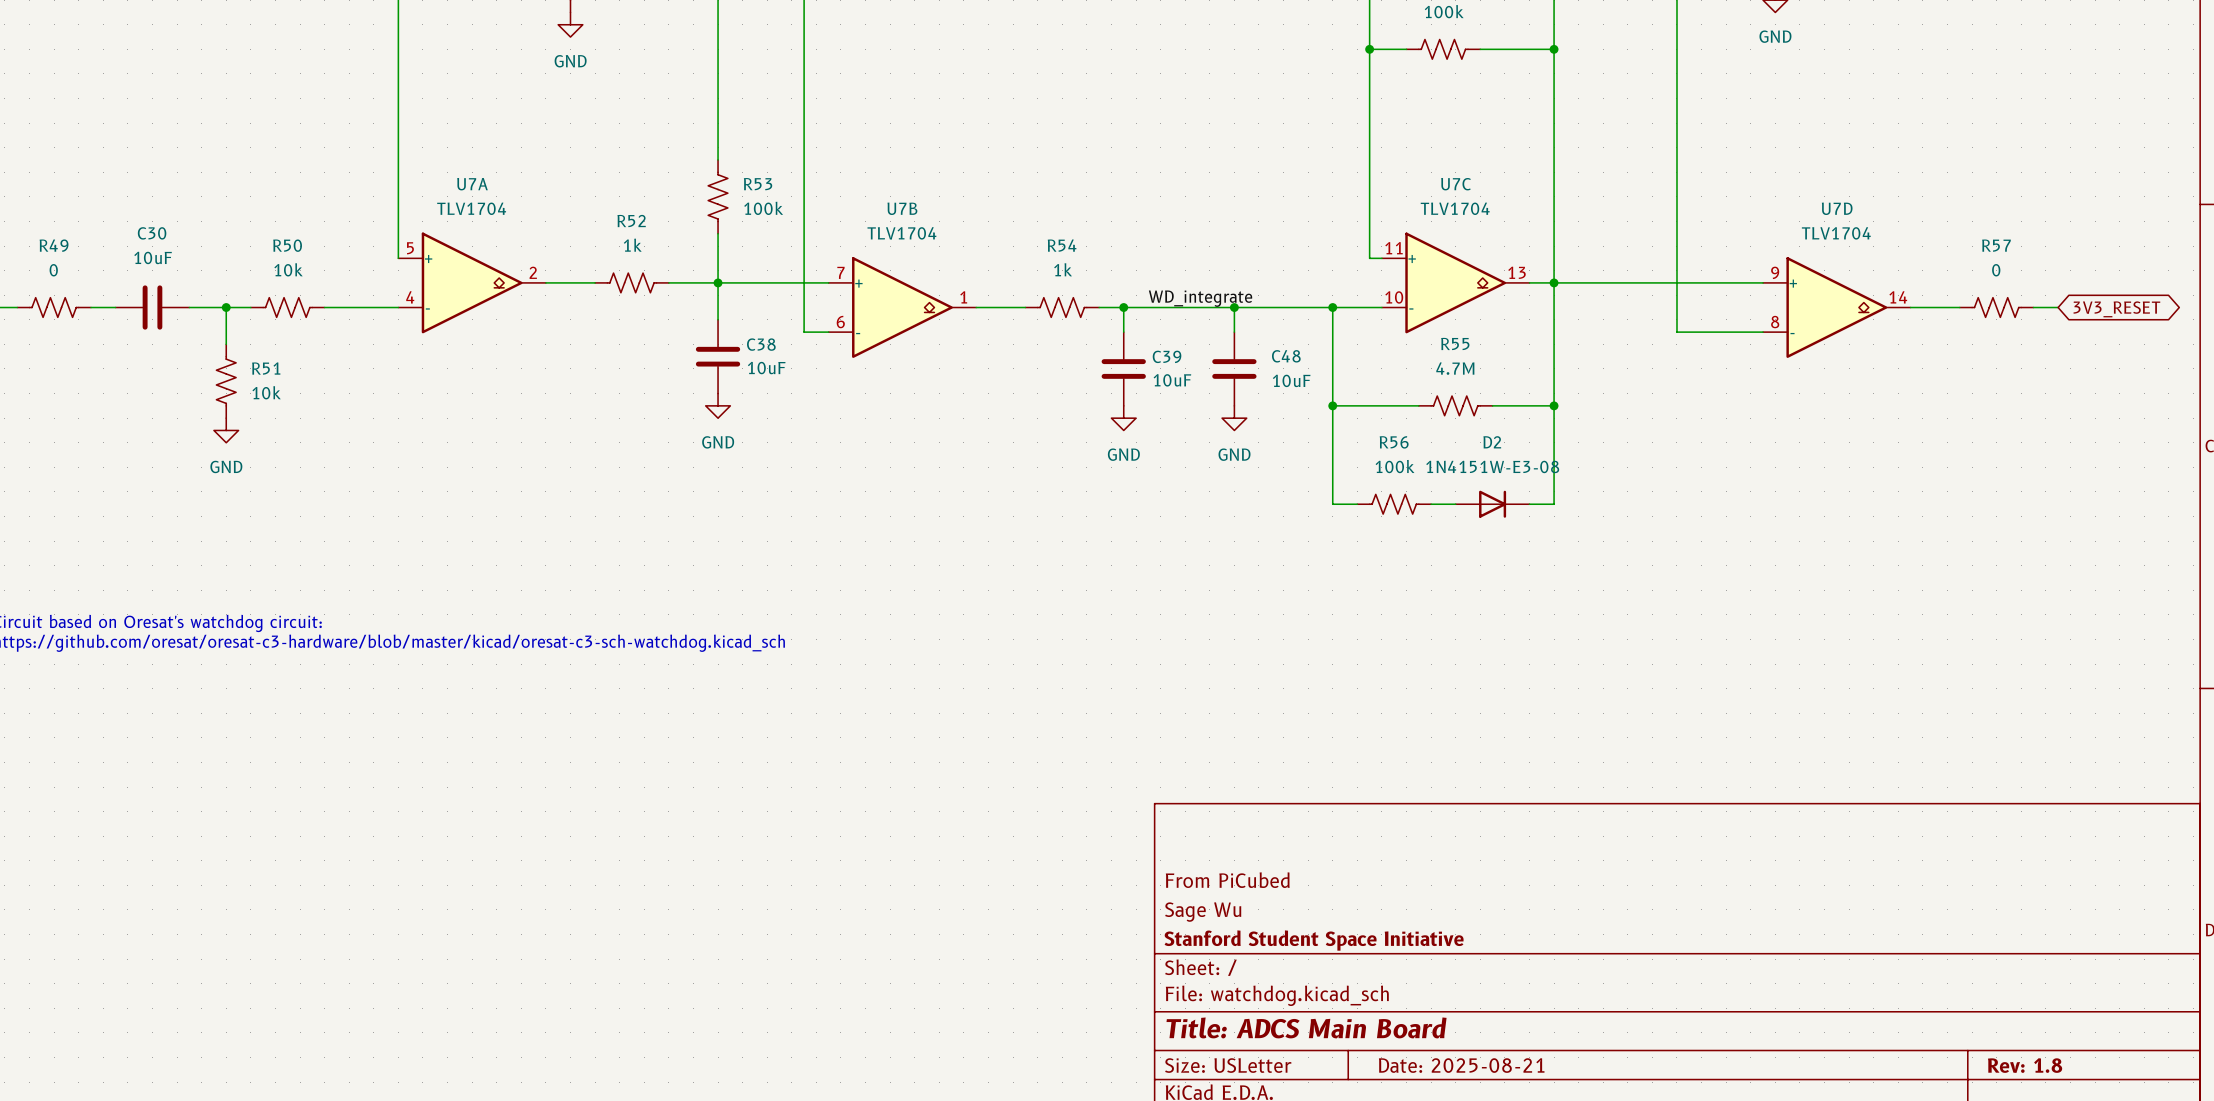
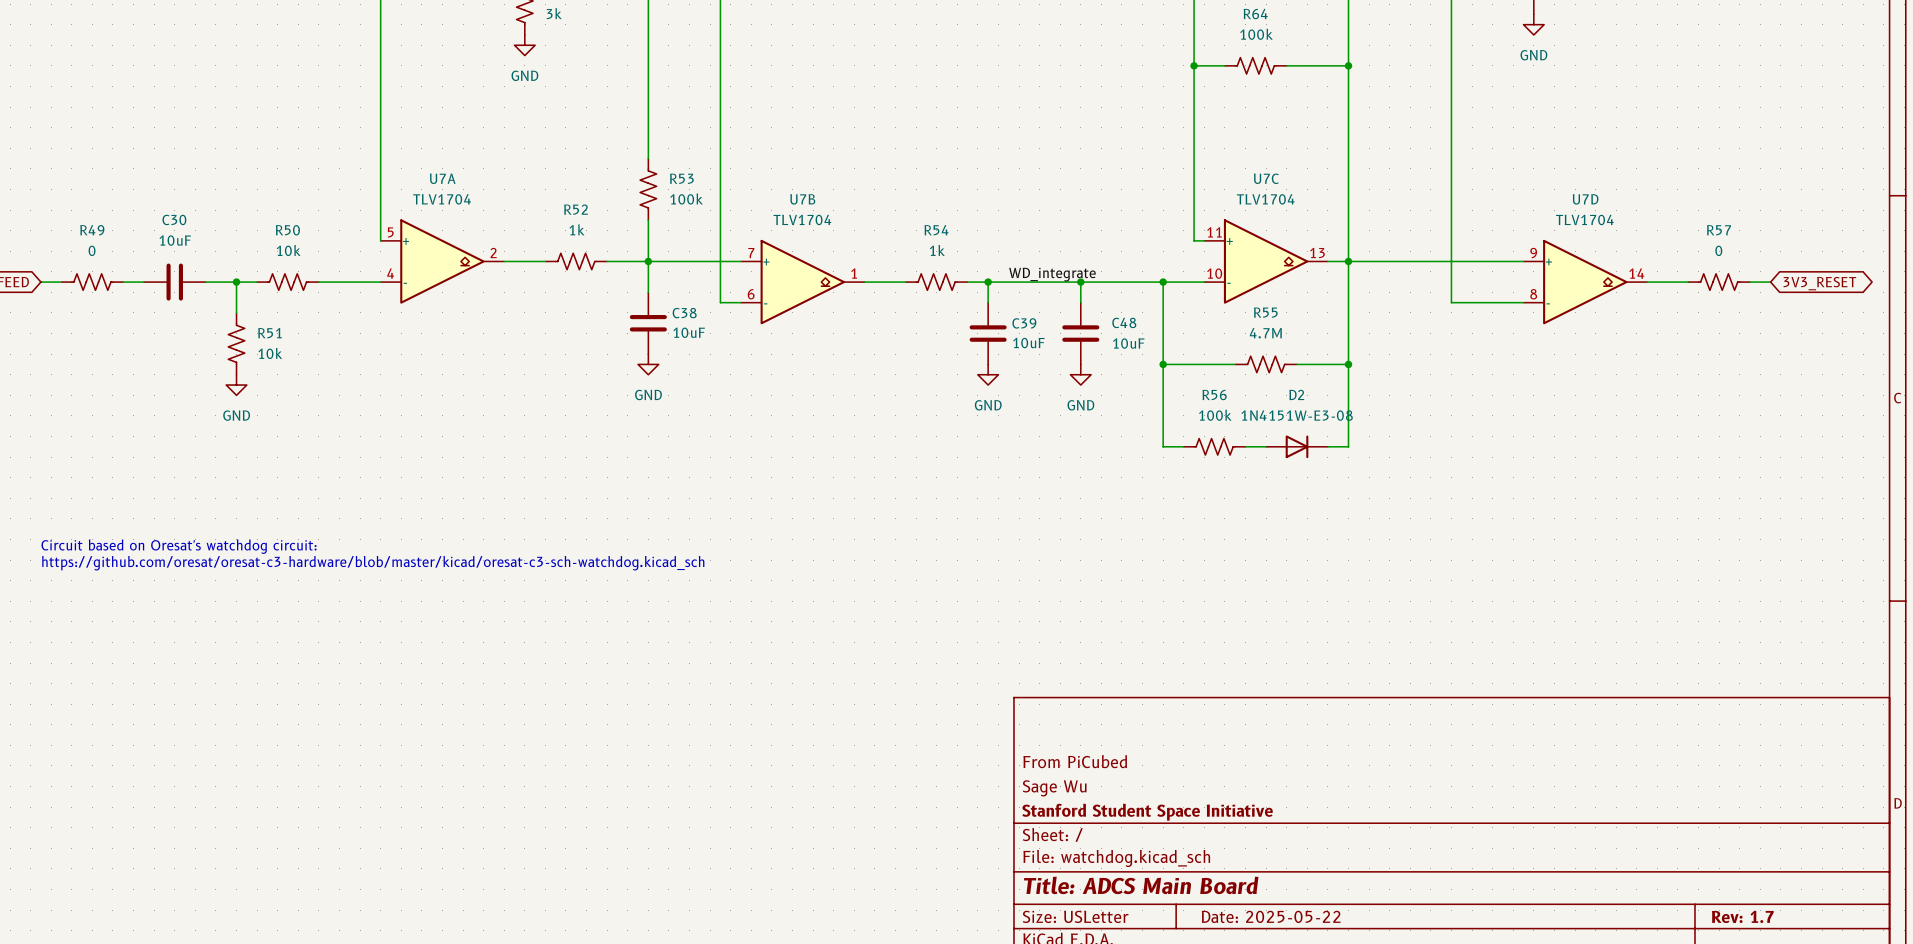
title block: Date: 2025-08-21 (1461, 1065) -> Date: 2025-05-22 (1271, 916)
title block: Rev: 1.8 (2025, 1065) -> Rev: 1.7 (1742, 916)

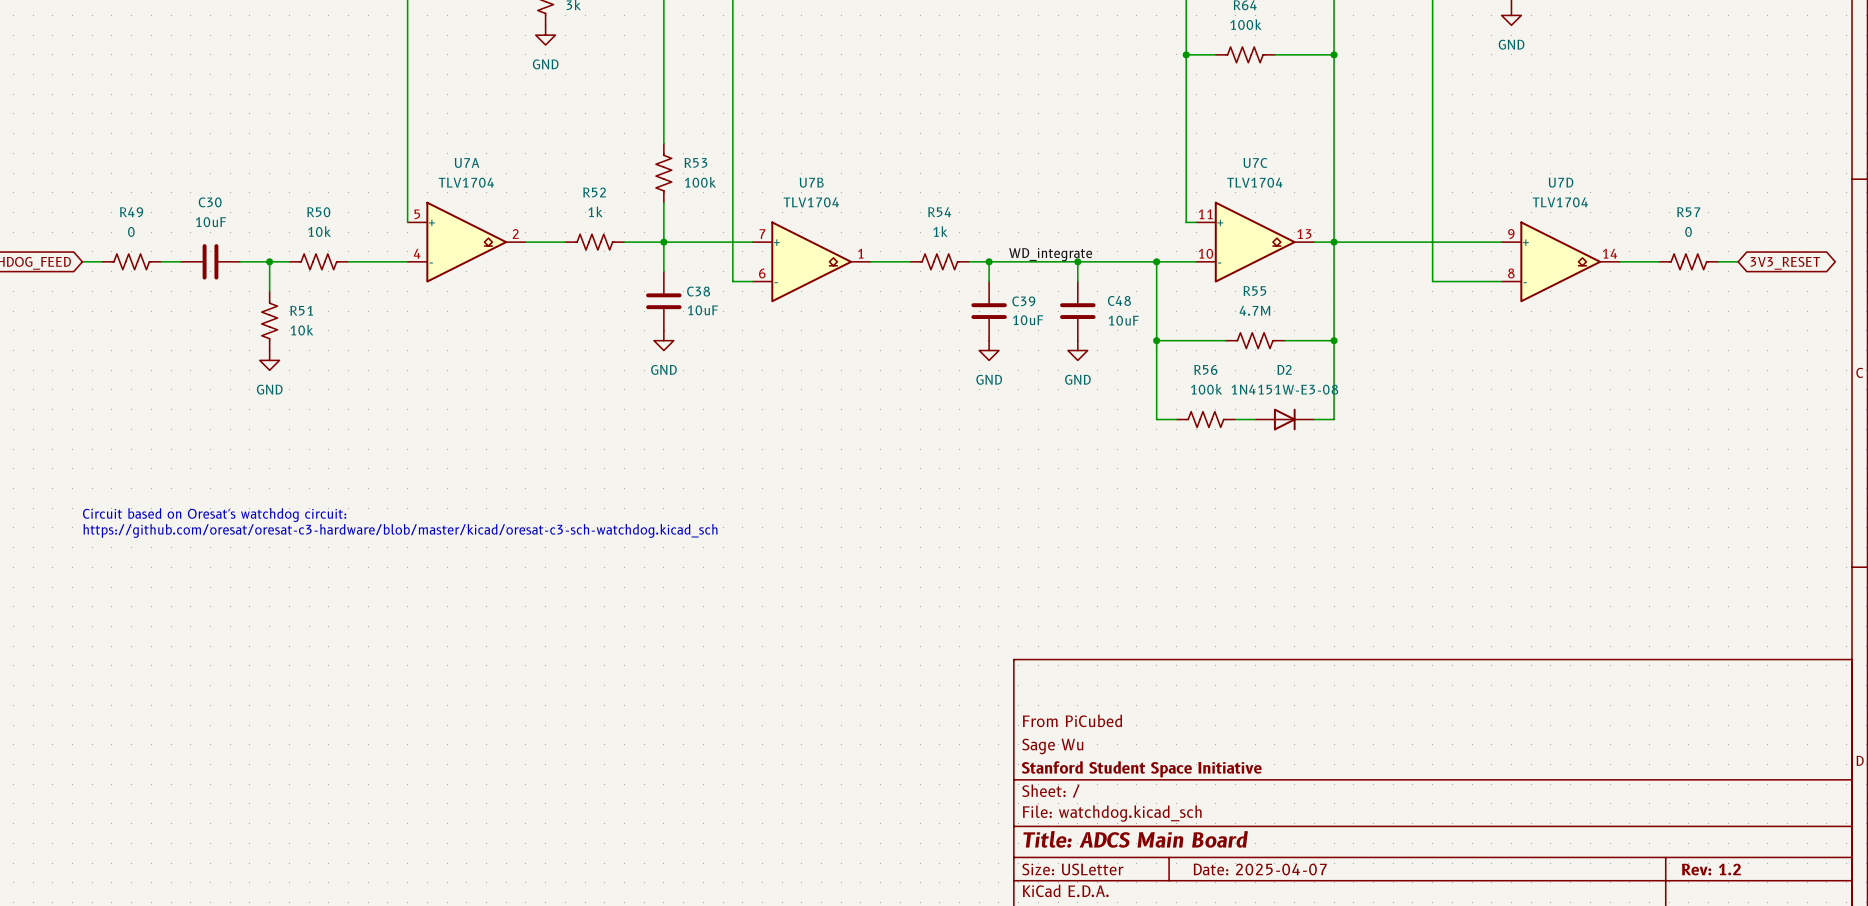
title block: Date: 2025-05-22 (1271, 916) -> Date: 2025-04-07 (1260, 869)
title block: Rev: 1.7 (1742, 916) -> Rev: 1.2 (1711, 869)

